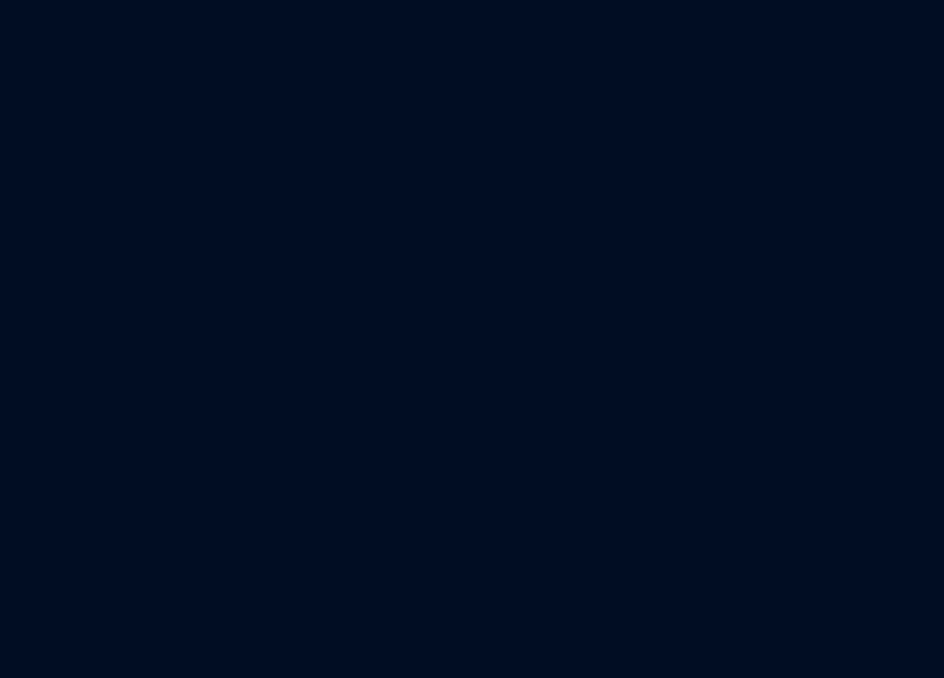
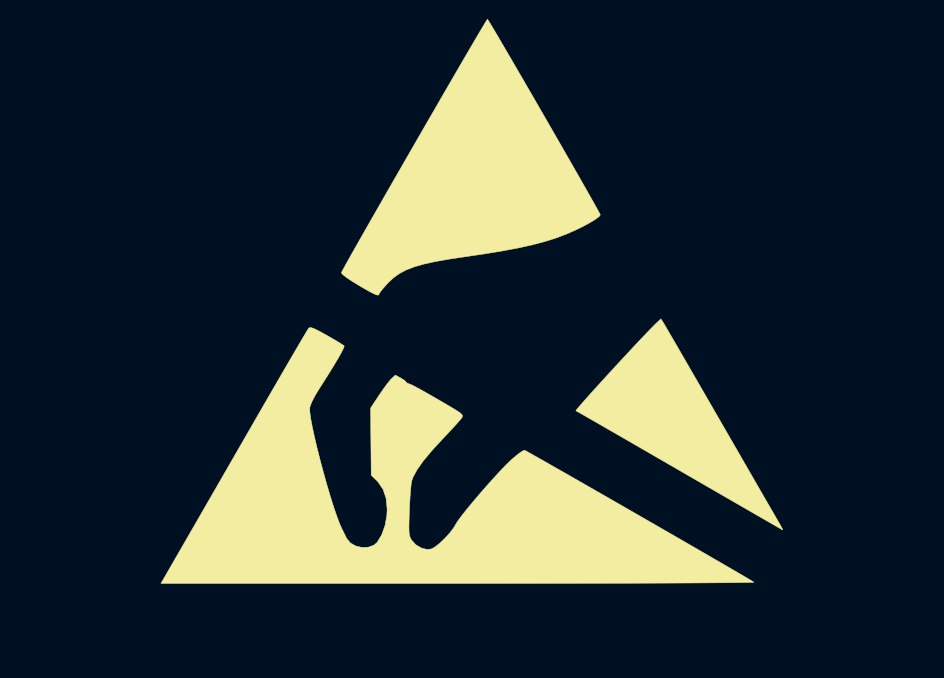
drawing: none -> [160, 18, 783, 584]

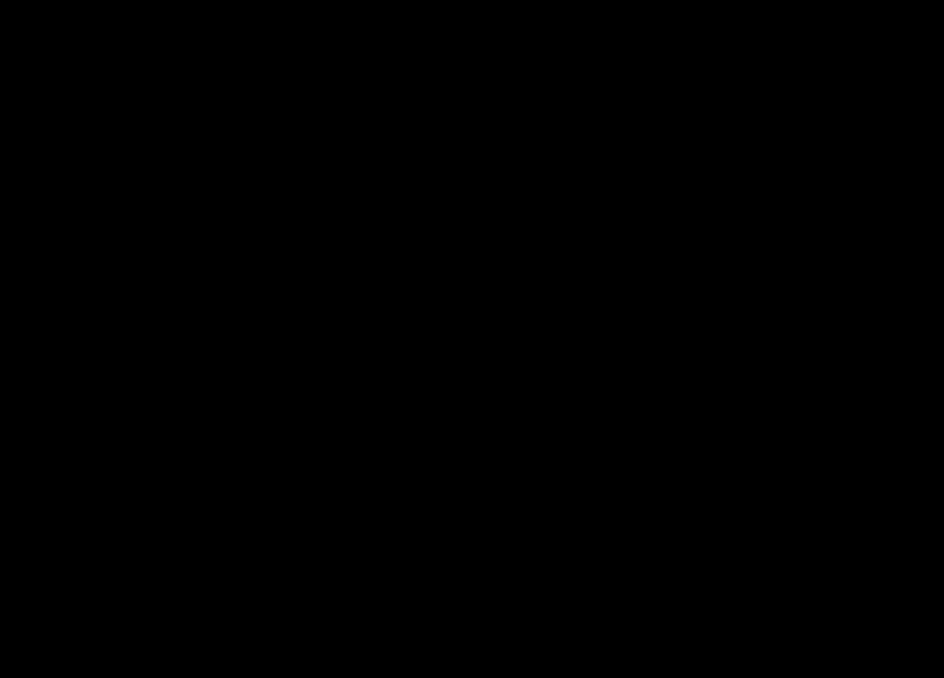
drawing: [160, 18, 783, 584] -> none

